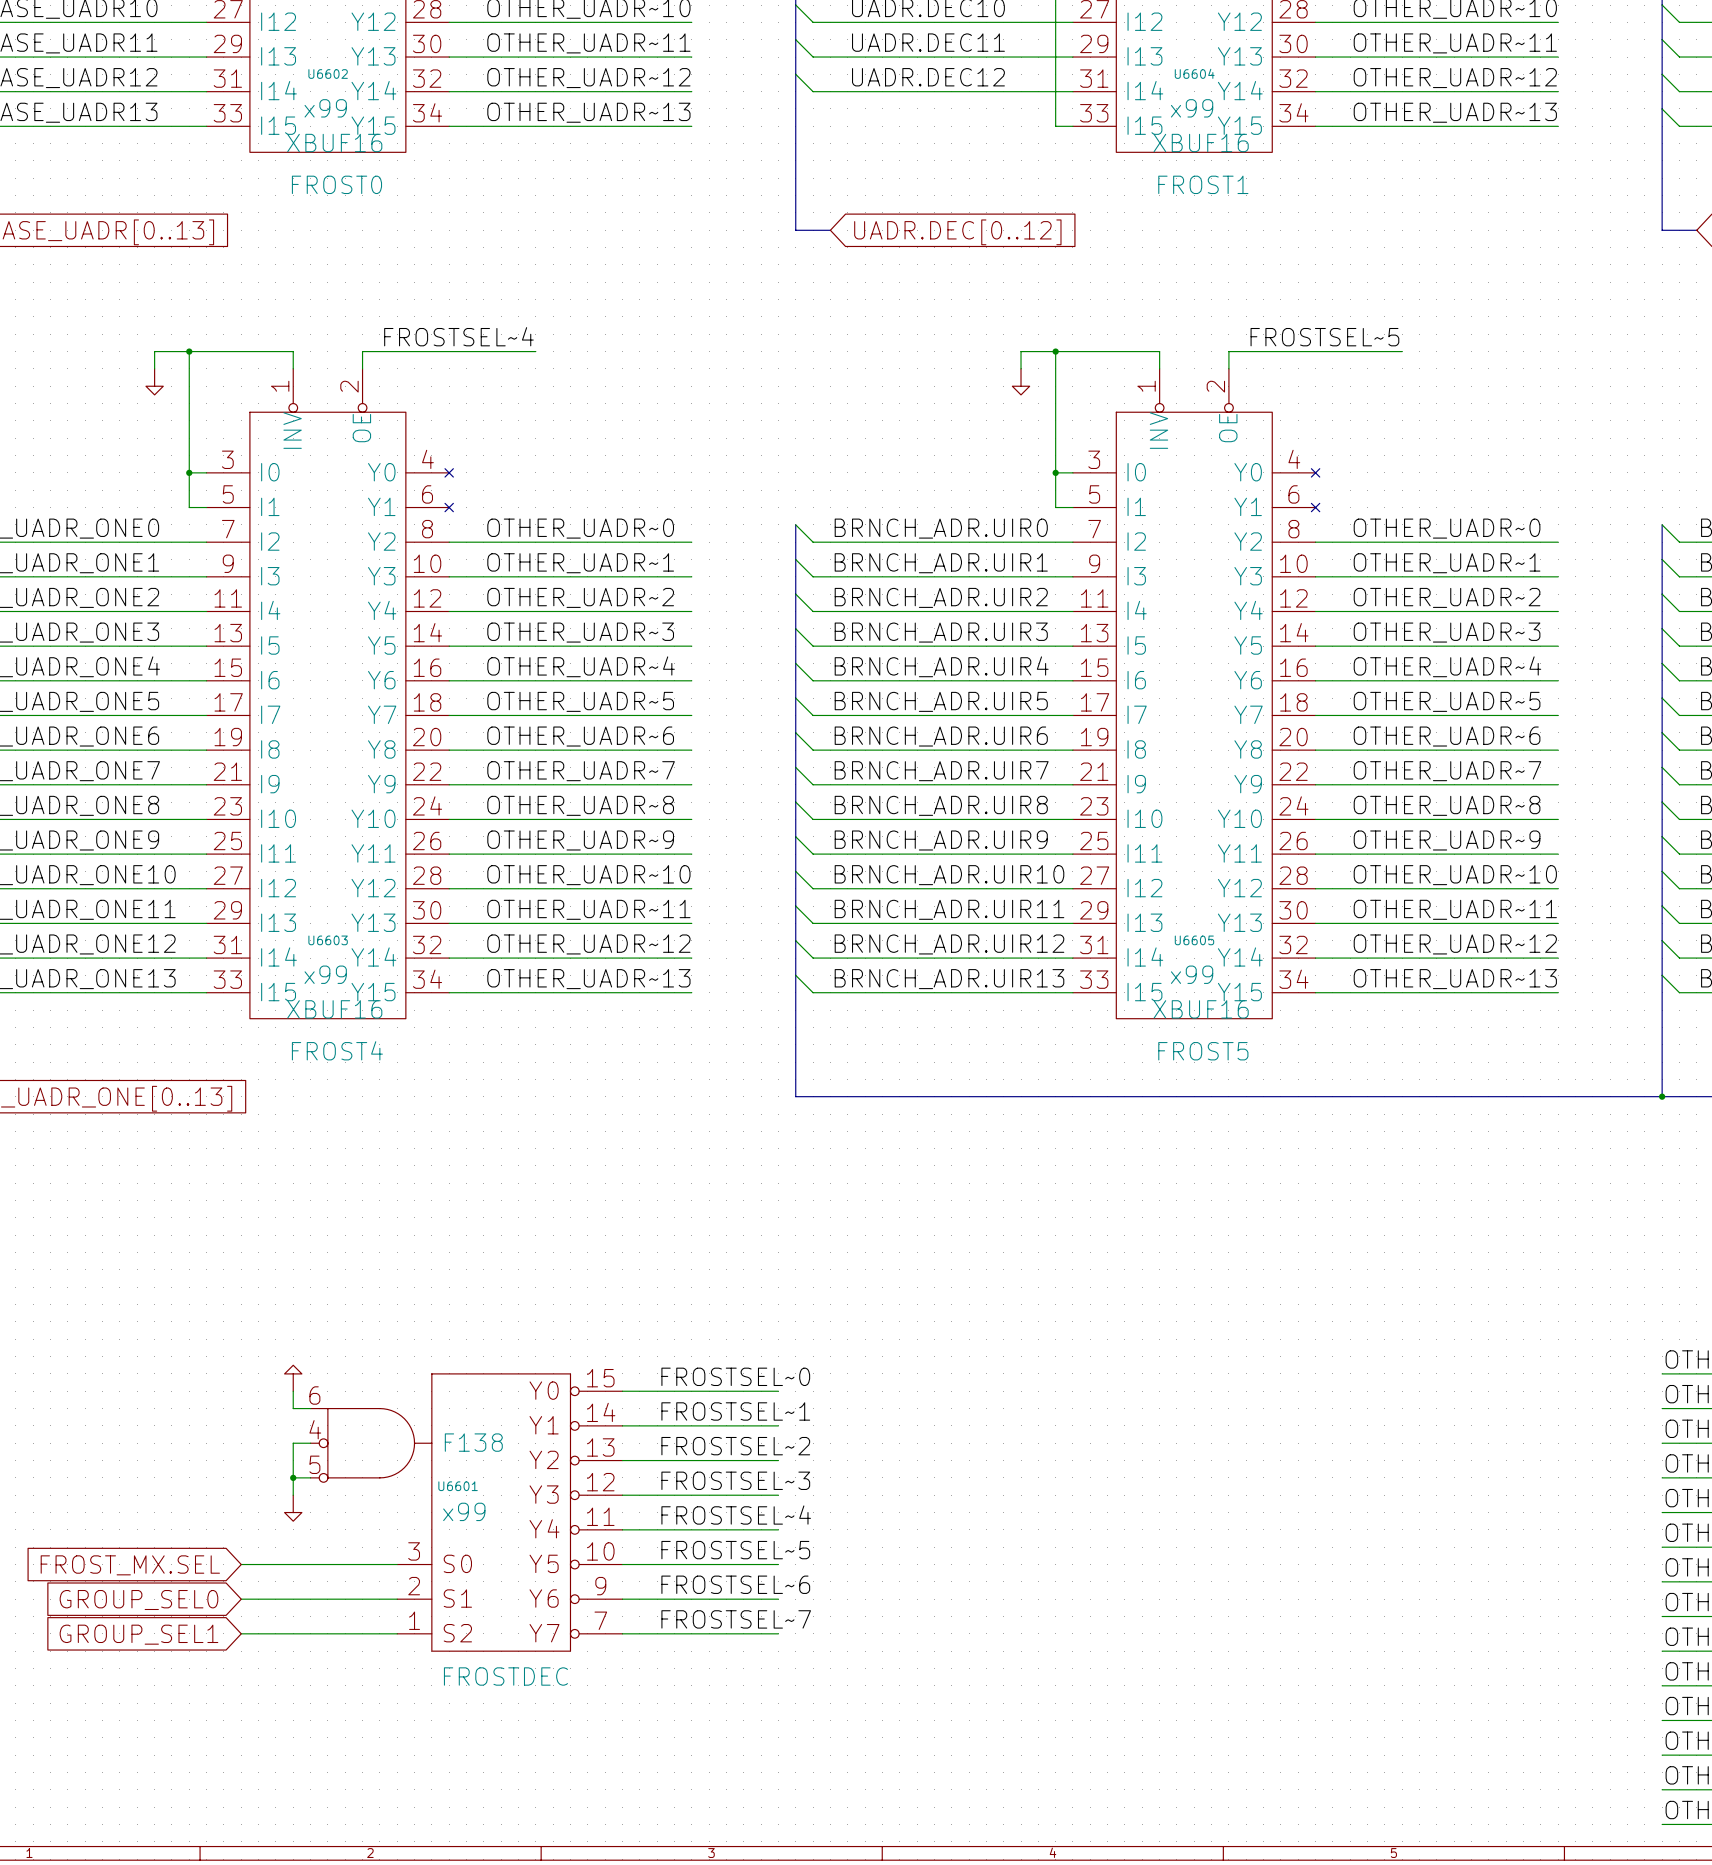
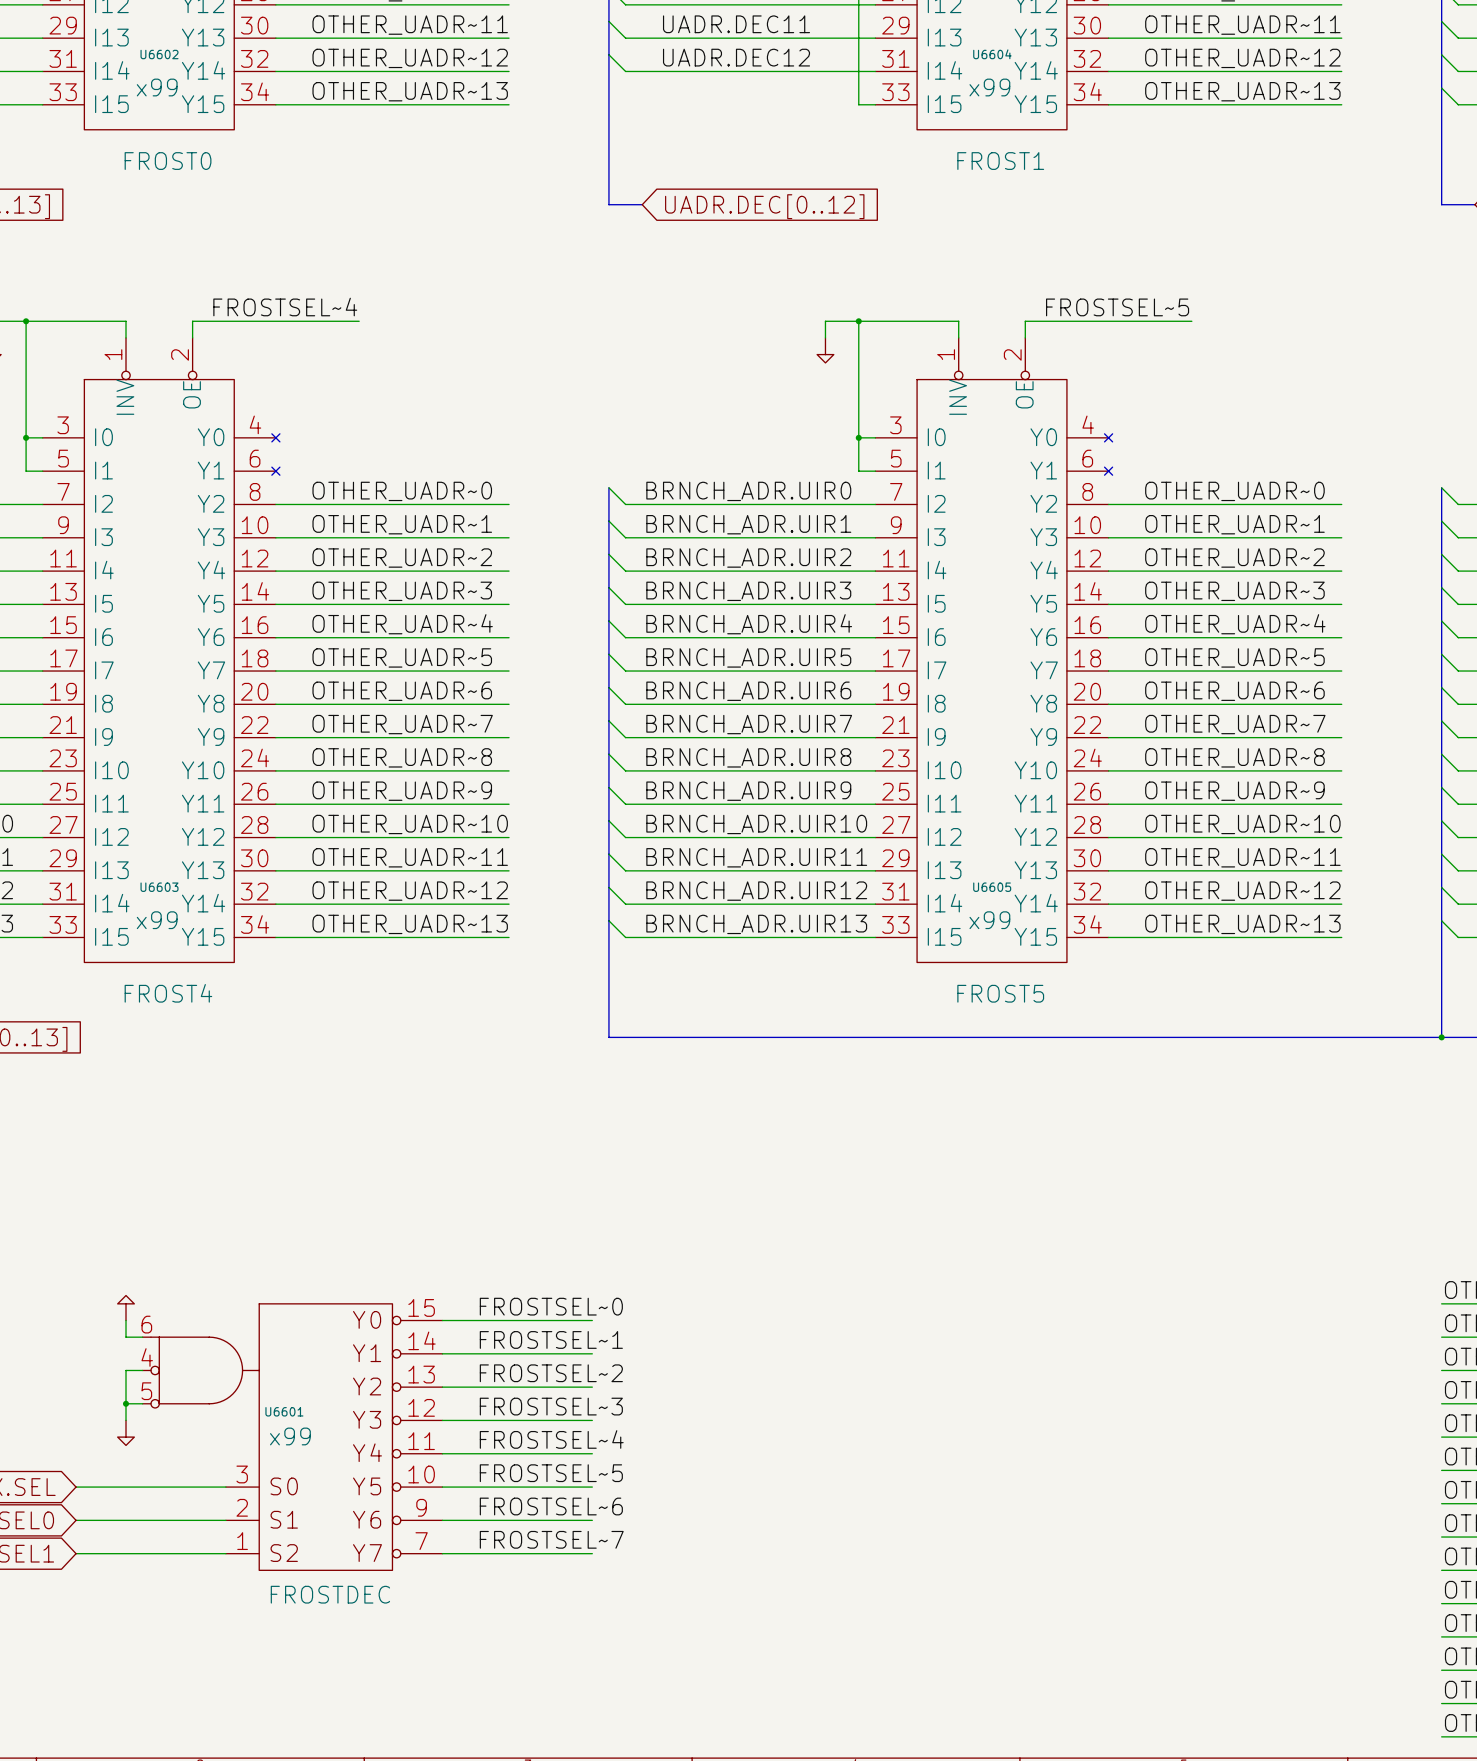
U6602 value: XBUF16 (334, 143) -> none
U6604 value: XBUF16 (1201, 143) -> none
U6603 value: XBUF16 (334, 1009) -> none
U6605 value: XBUF16 (1201, 1009) -> none
U6601 value: F138 (473, 1442) -> none

